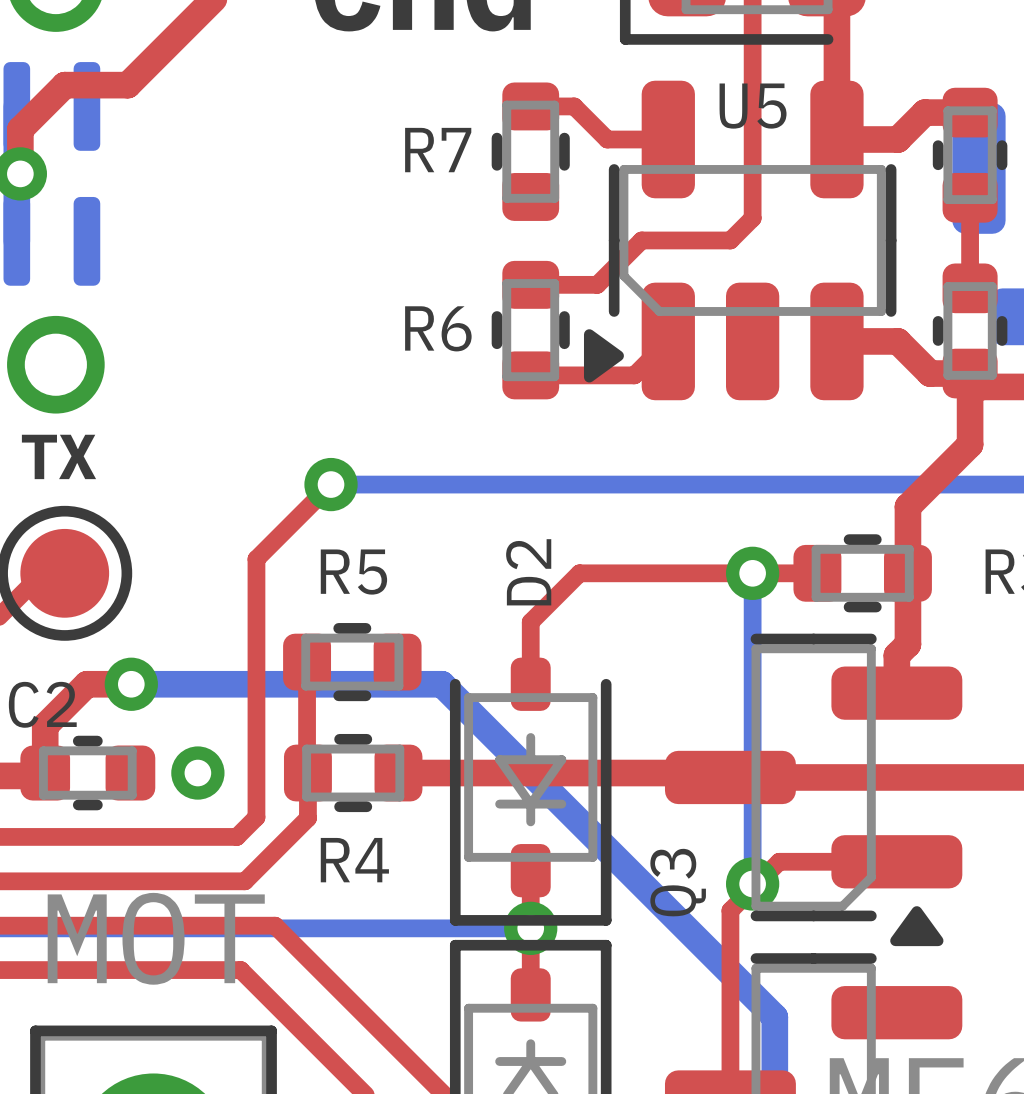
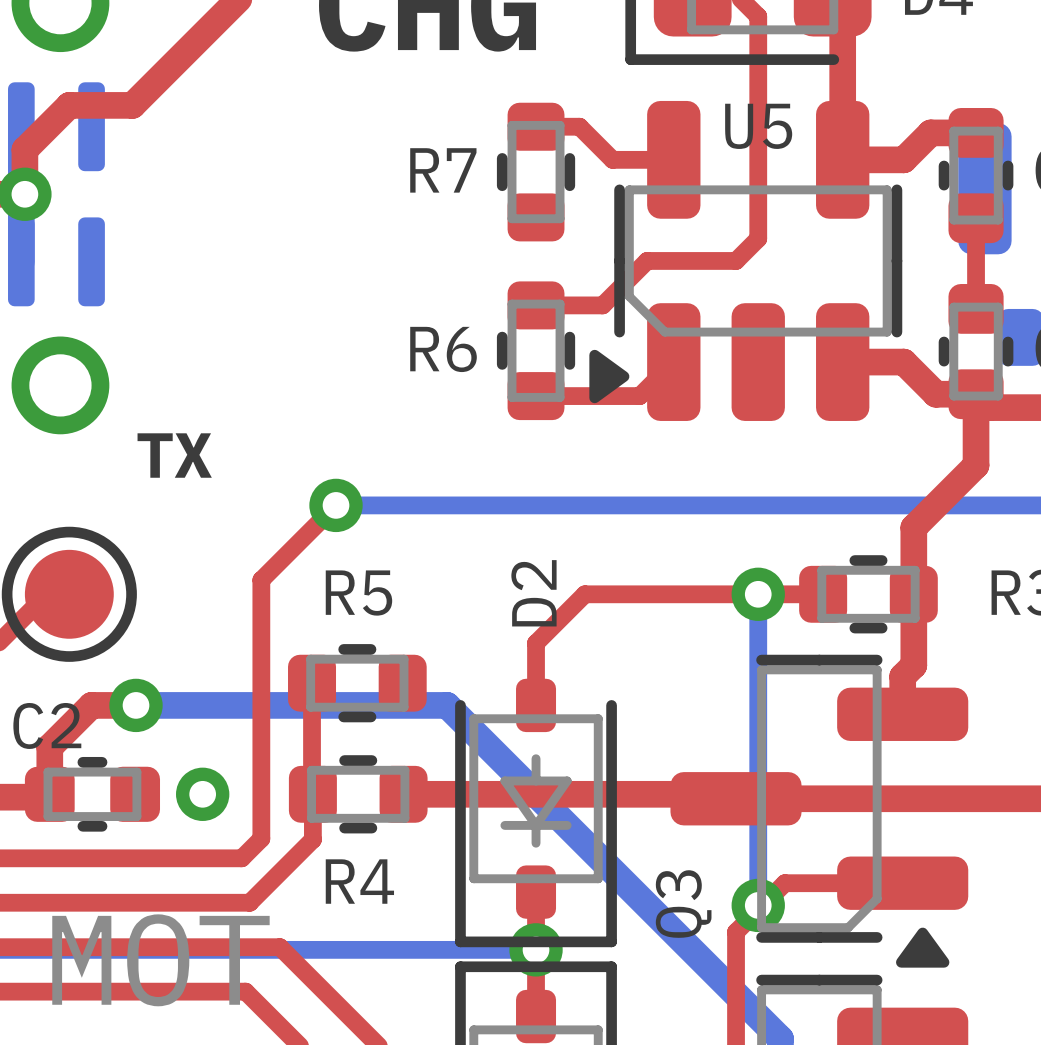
text position: TX (58, 456) -> TX (174, 455)

